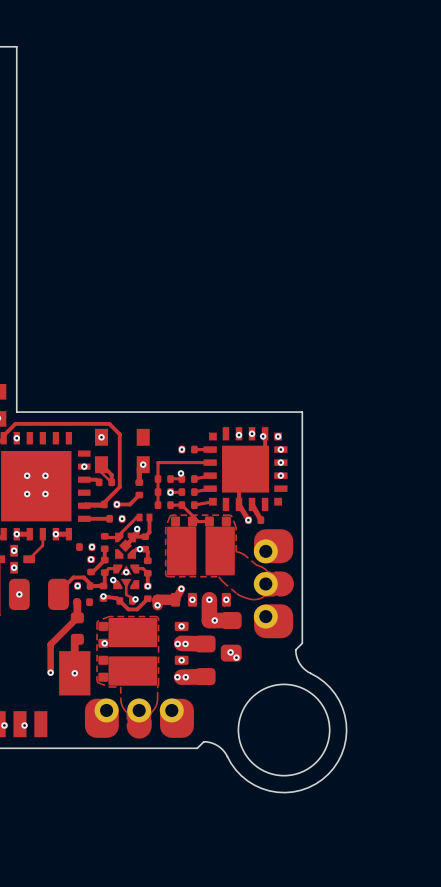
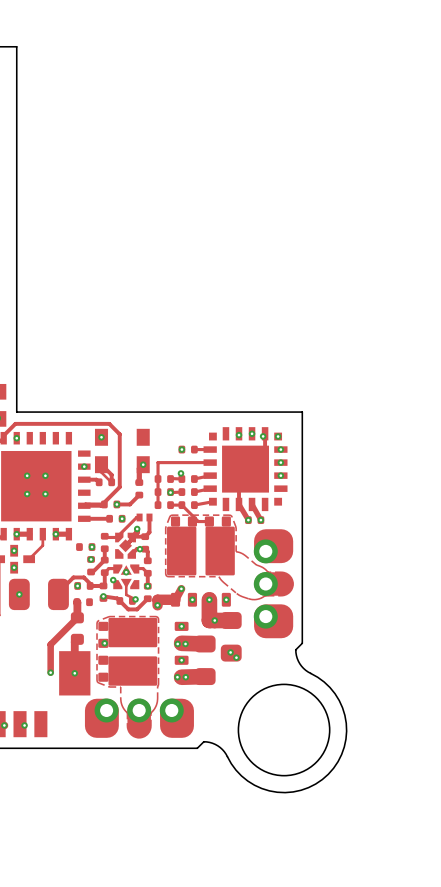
via: none -> (260, 520)

